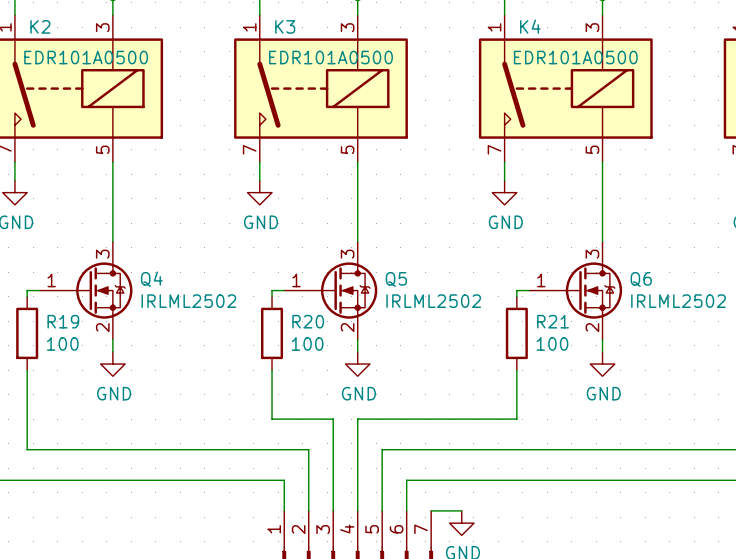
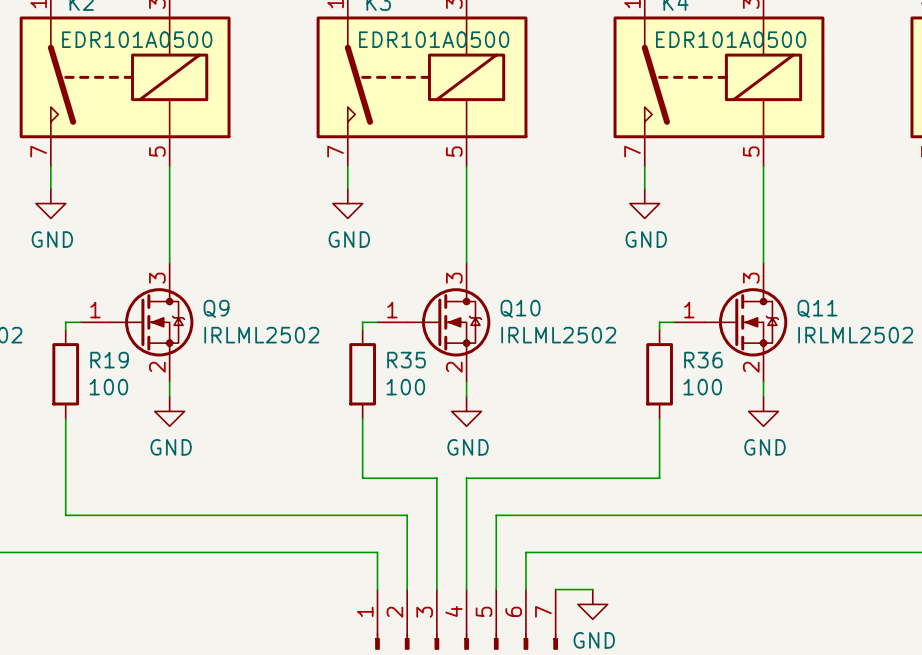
Q4 name: Q4 (151, 279) -> Q9 (216, 308)
Q5 name: Q5 (396, 279) -> Q10 (520, 308)
Q6 name: Q6 (641, 279) -> Q11 (817, 308)
R20 name: R20 (308, 321) -> R35 (406, 360)
R21 name: R21 (553, 321) -> R36 (703, 360)

